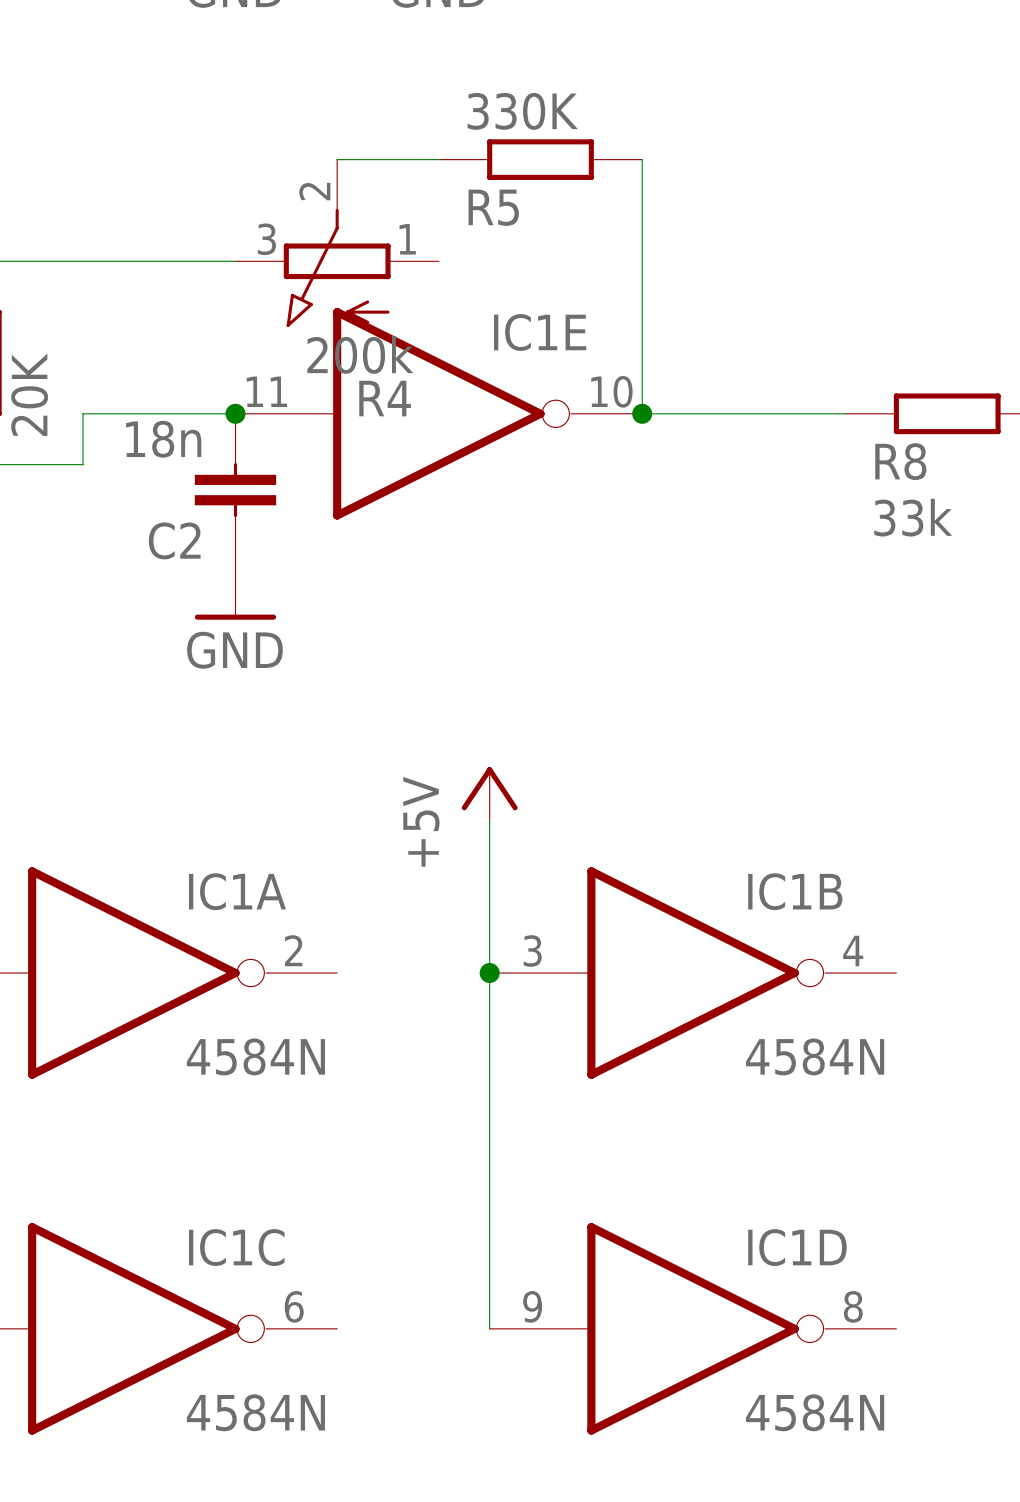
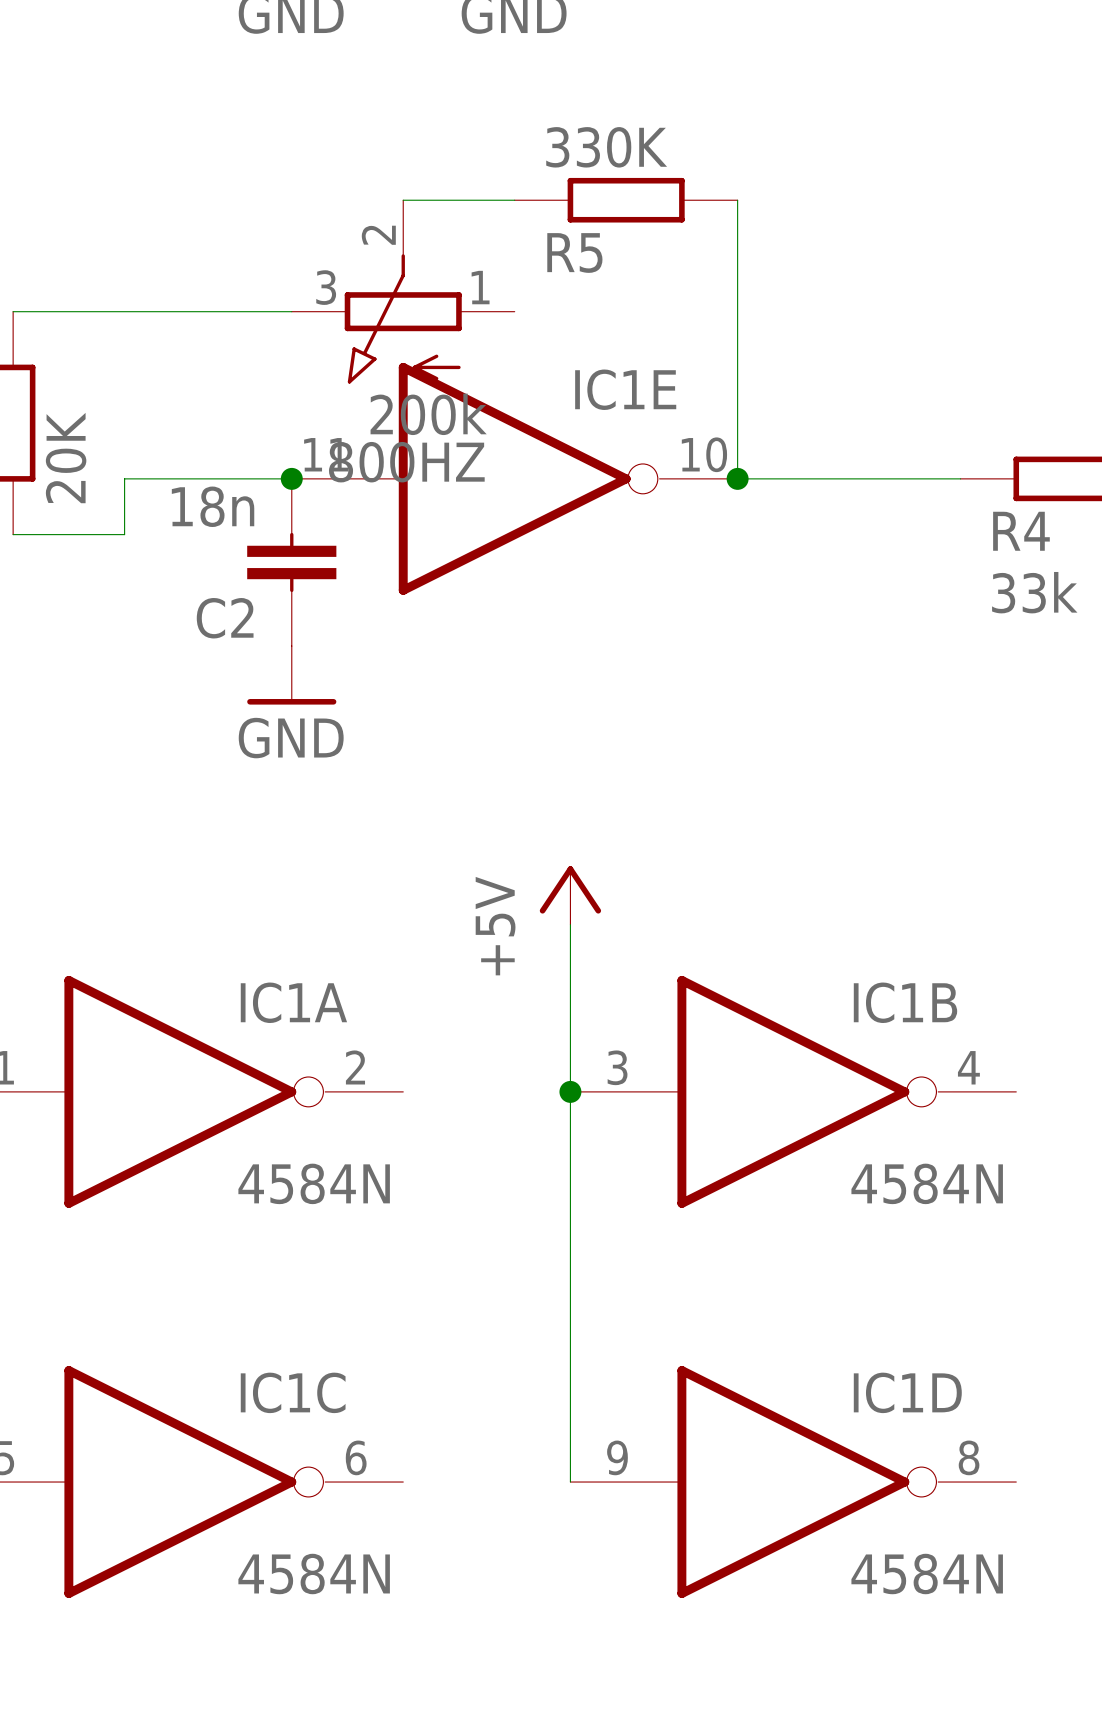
R4 name: R4 (385, 398) -> 800HZ (406, 462)
R8 name: R8 (900, 461) -> R4 (1021, 531)

